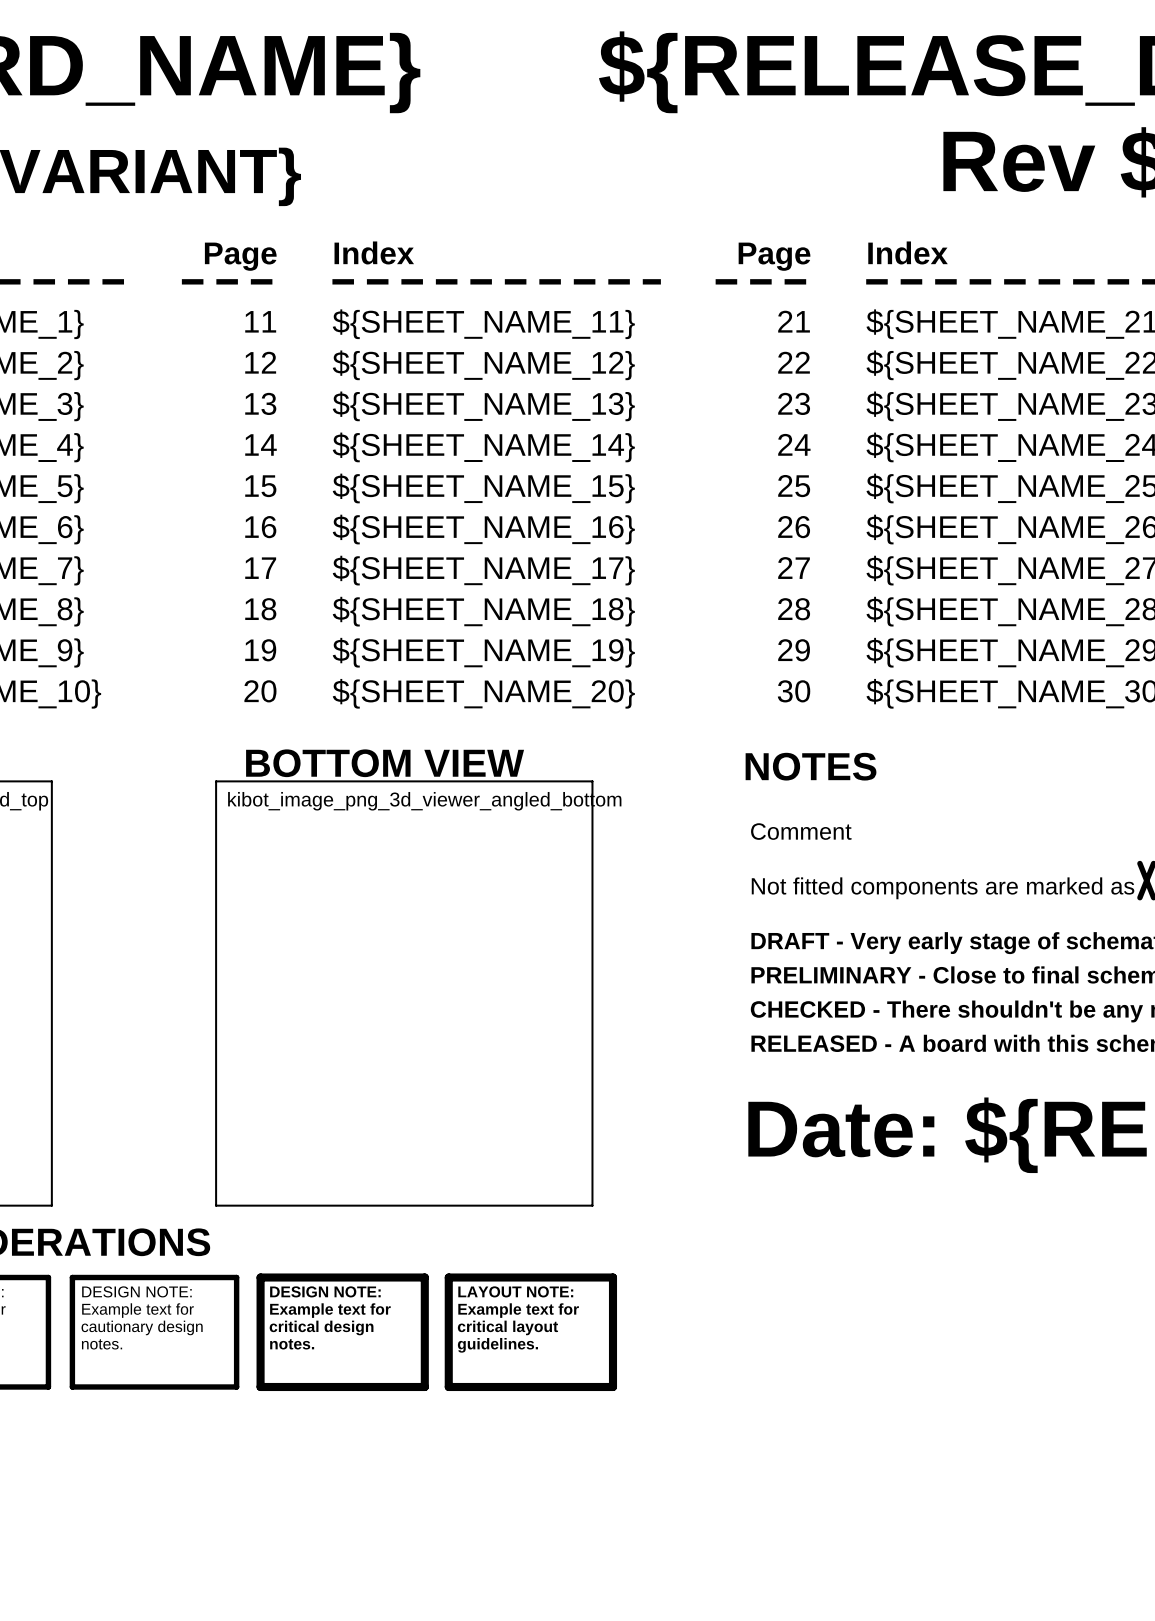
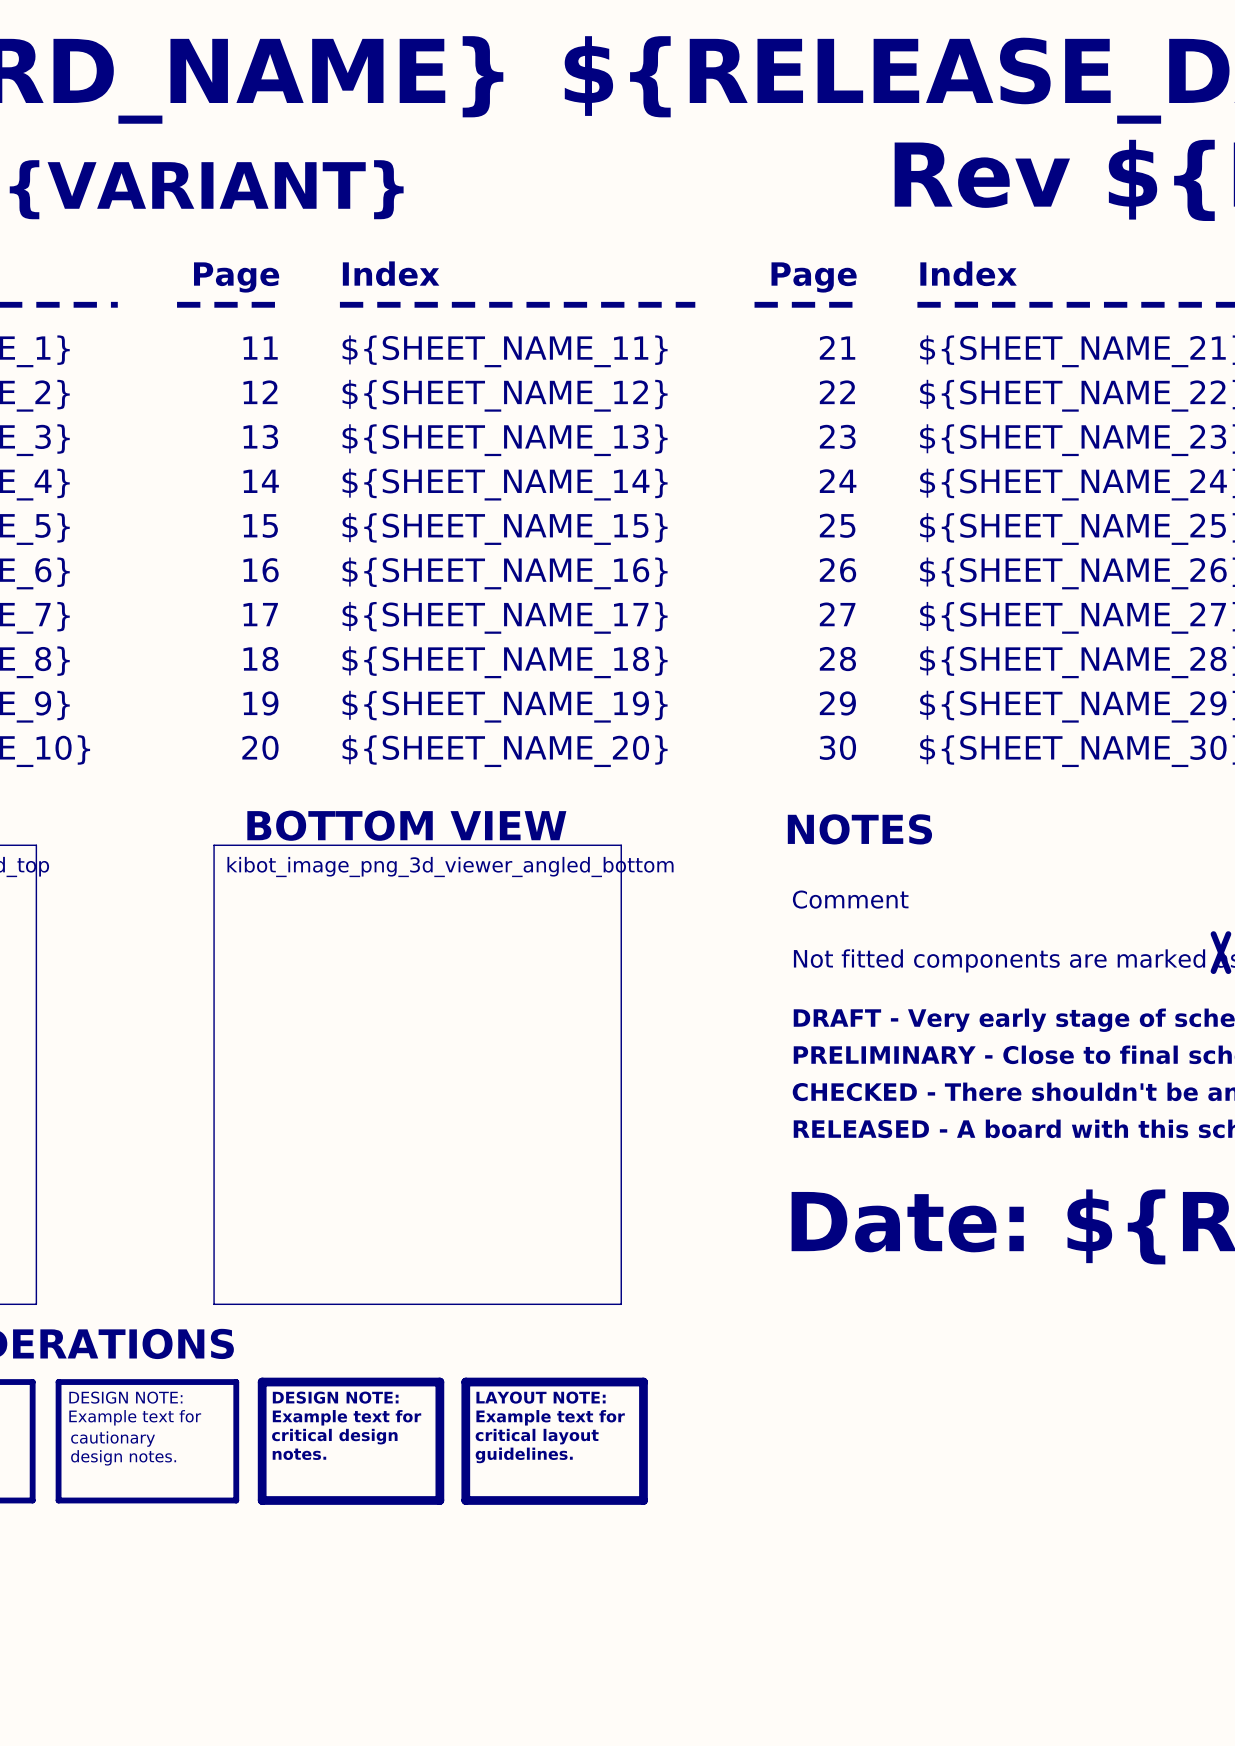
text: cautionary design (142, 1327) -> cautionary (113, 1439)
text: notes. (102, 1344) -> design notes. (123, 1457)

